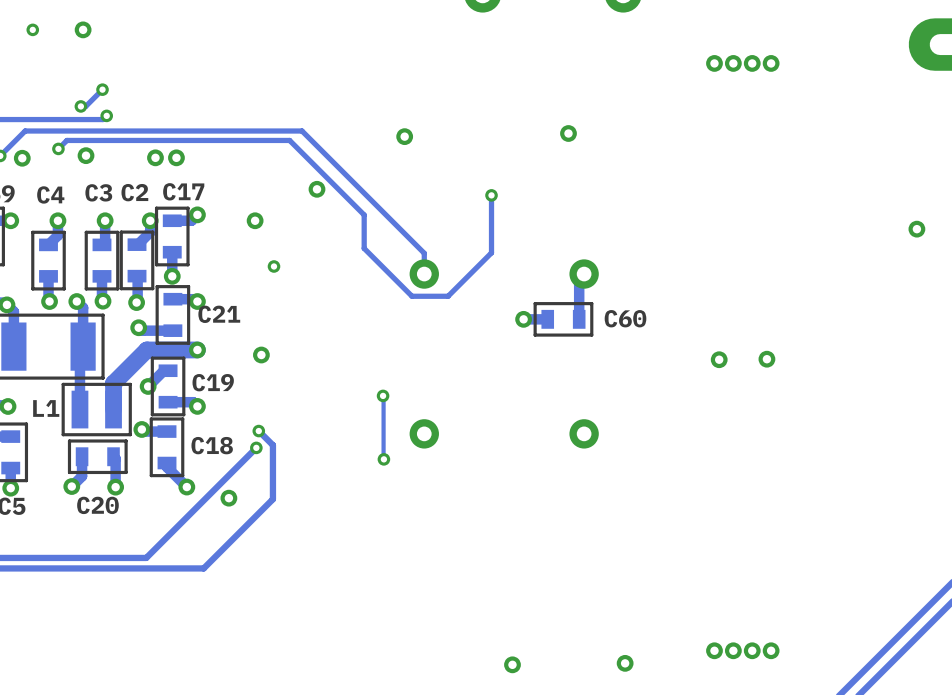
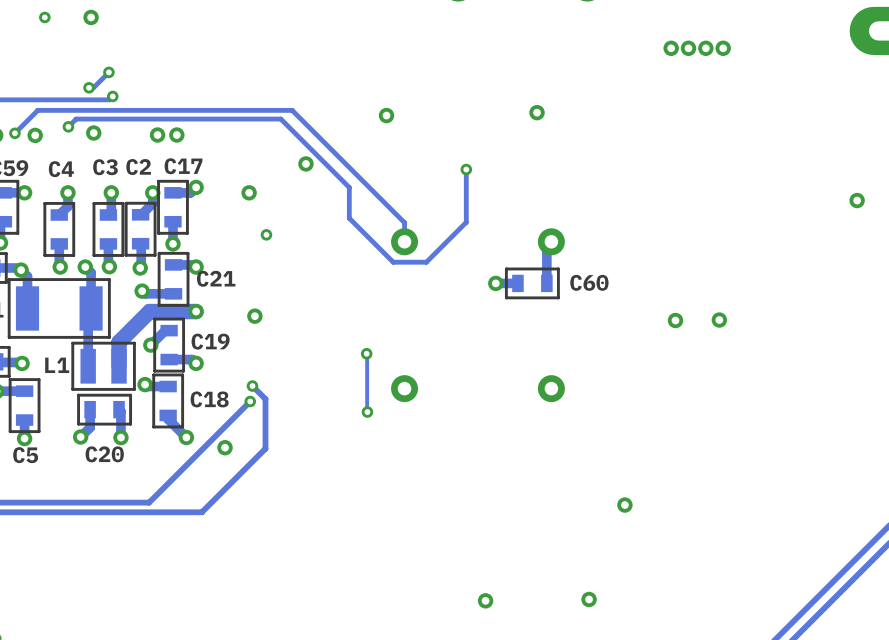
via: none -> (624, 505)
via: (714, 650) -> none
via: (733, 650) -> none
via: (752, 650) -> none
via: (771, 650) -> none

